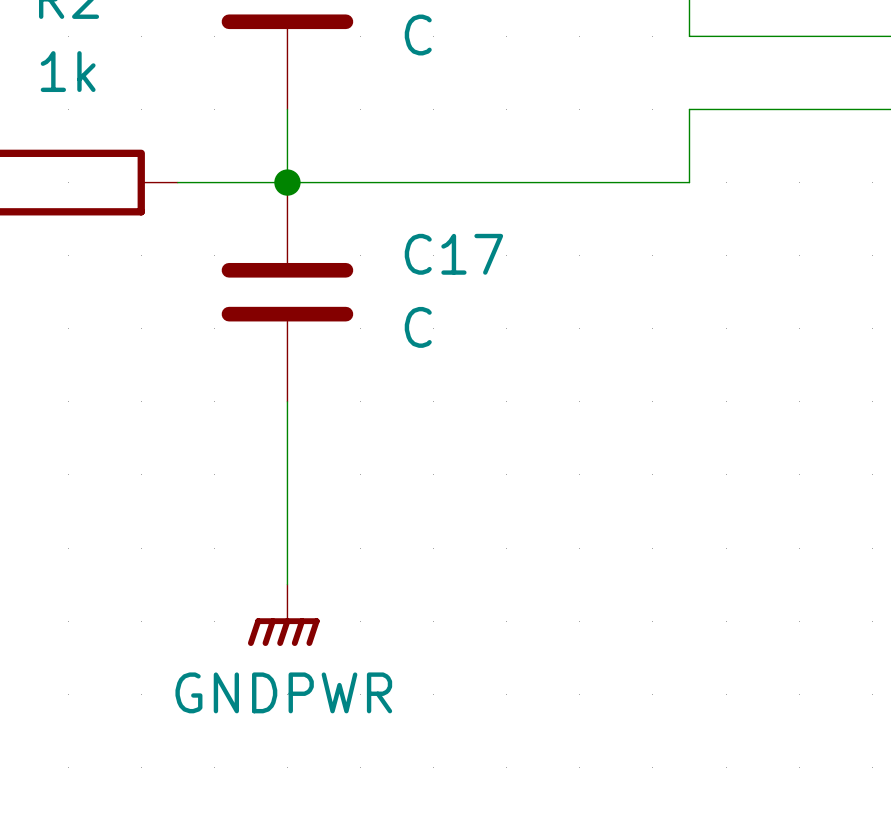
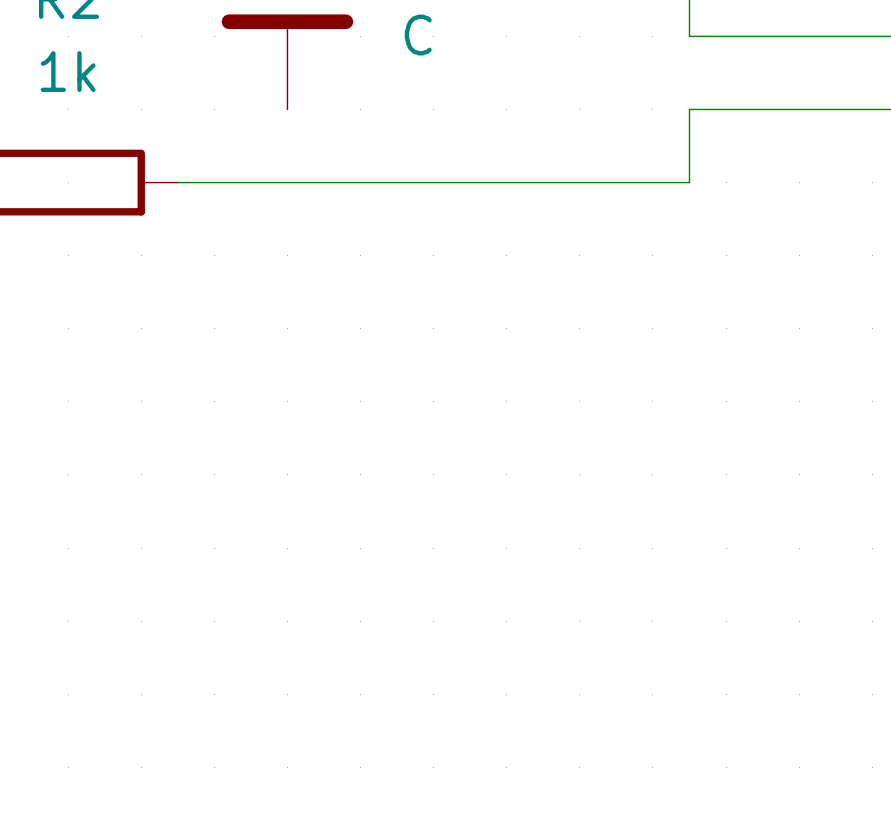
wire: (287, 109) (287, 182) -> none
junction: (287, 182) -> none
C17: C (287, 292) -> none
wire: (287, 401) (287, 584) -> none
power symbol: GNDPWR (283, 615) -> none

